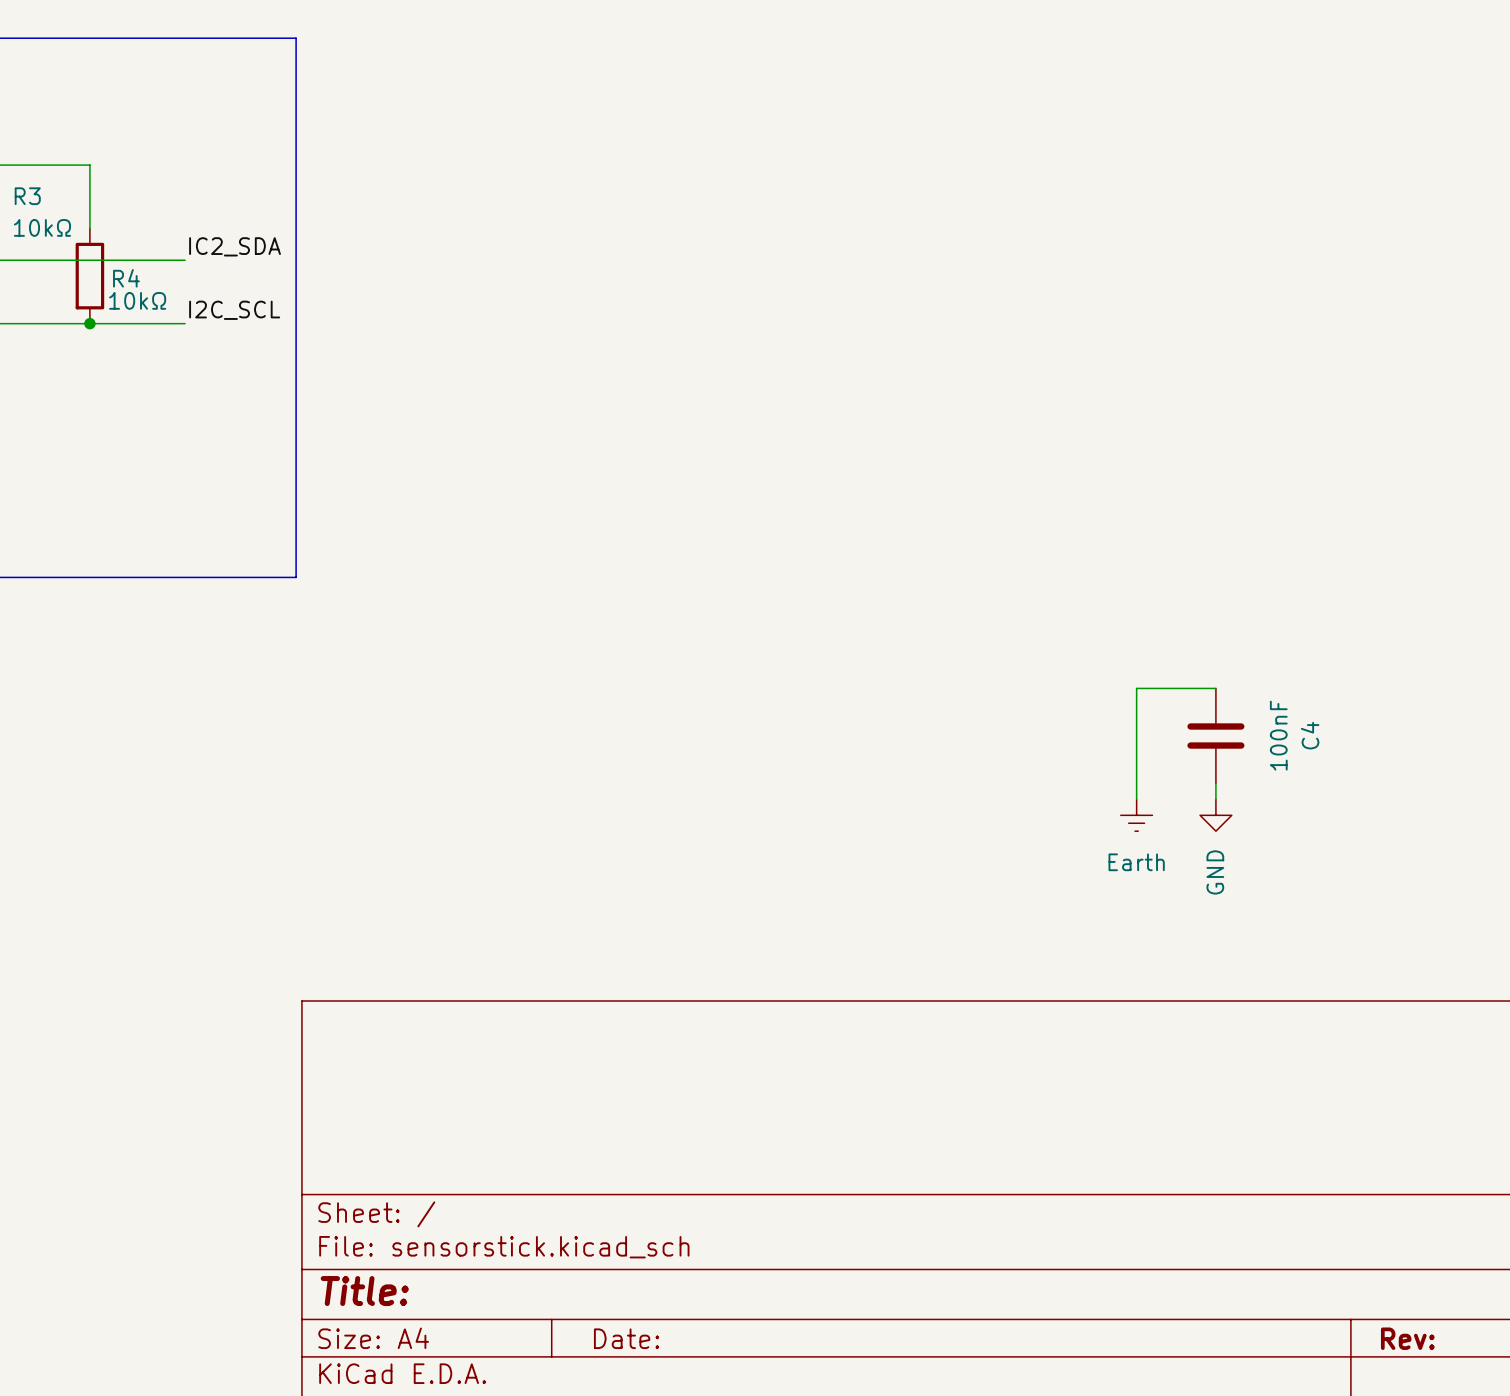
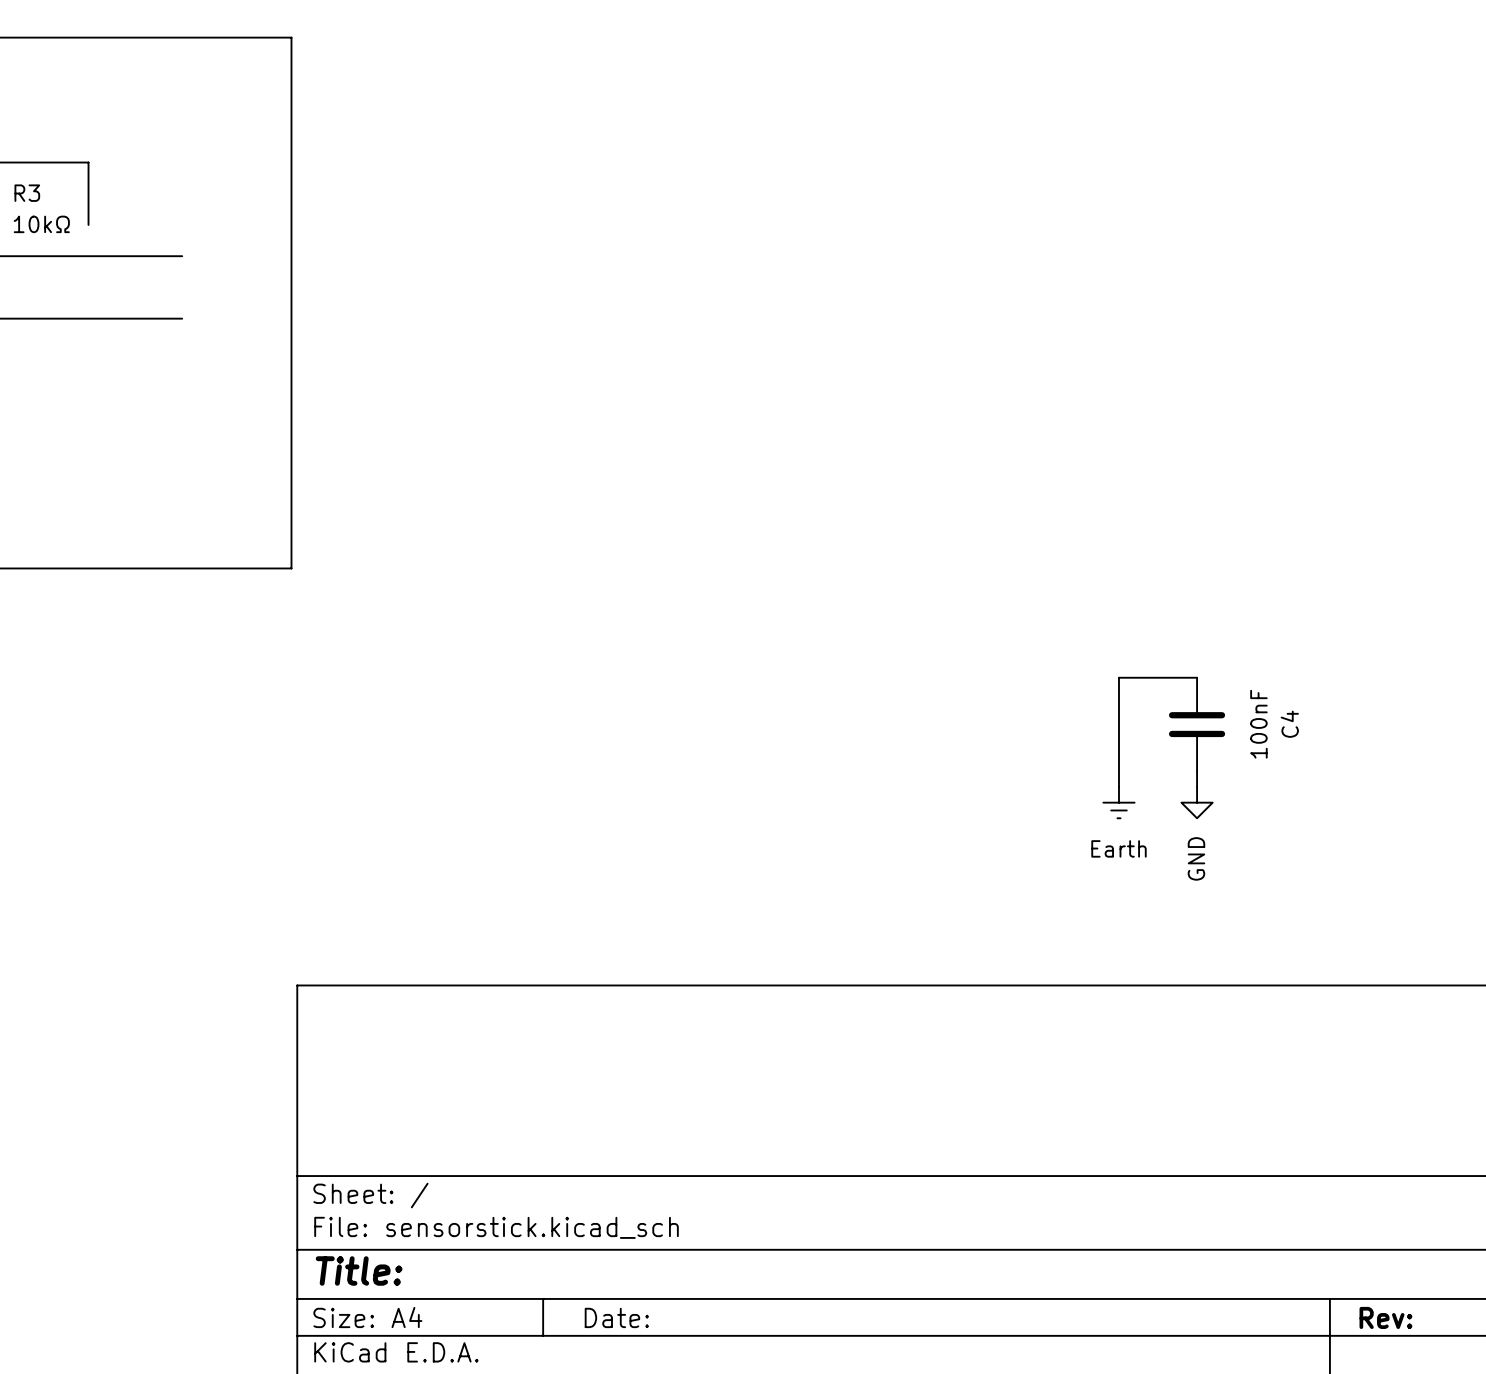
label: IC2_SDA (235, 246) -> none
R4: 10kΩ (89, 276) -> none
label: I2C_SCL (234, 310) -> none
junction: (89, 323) -> none

